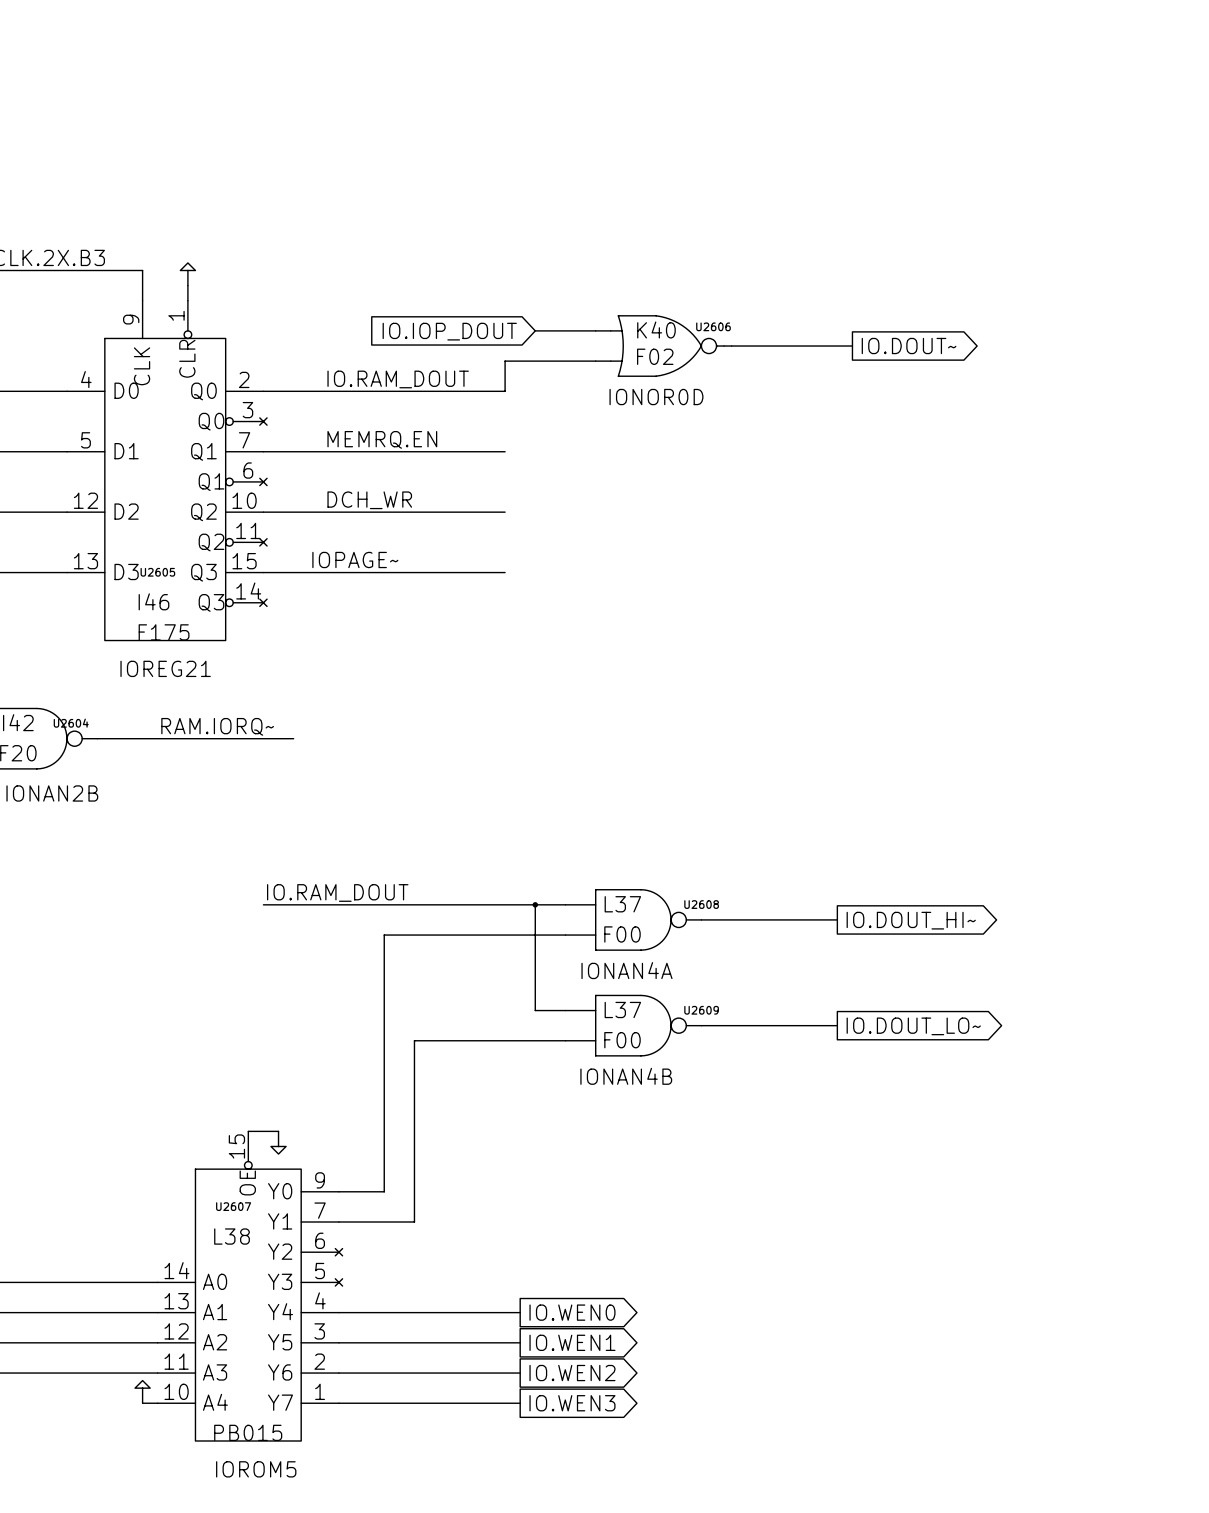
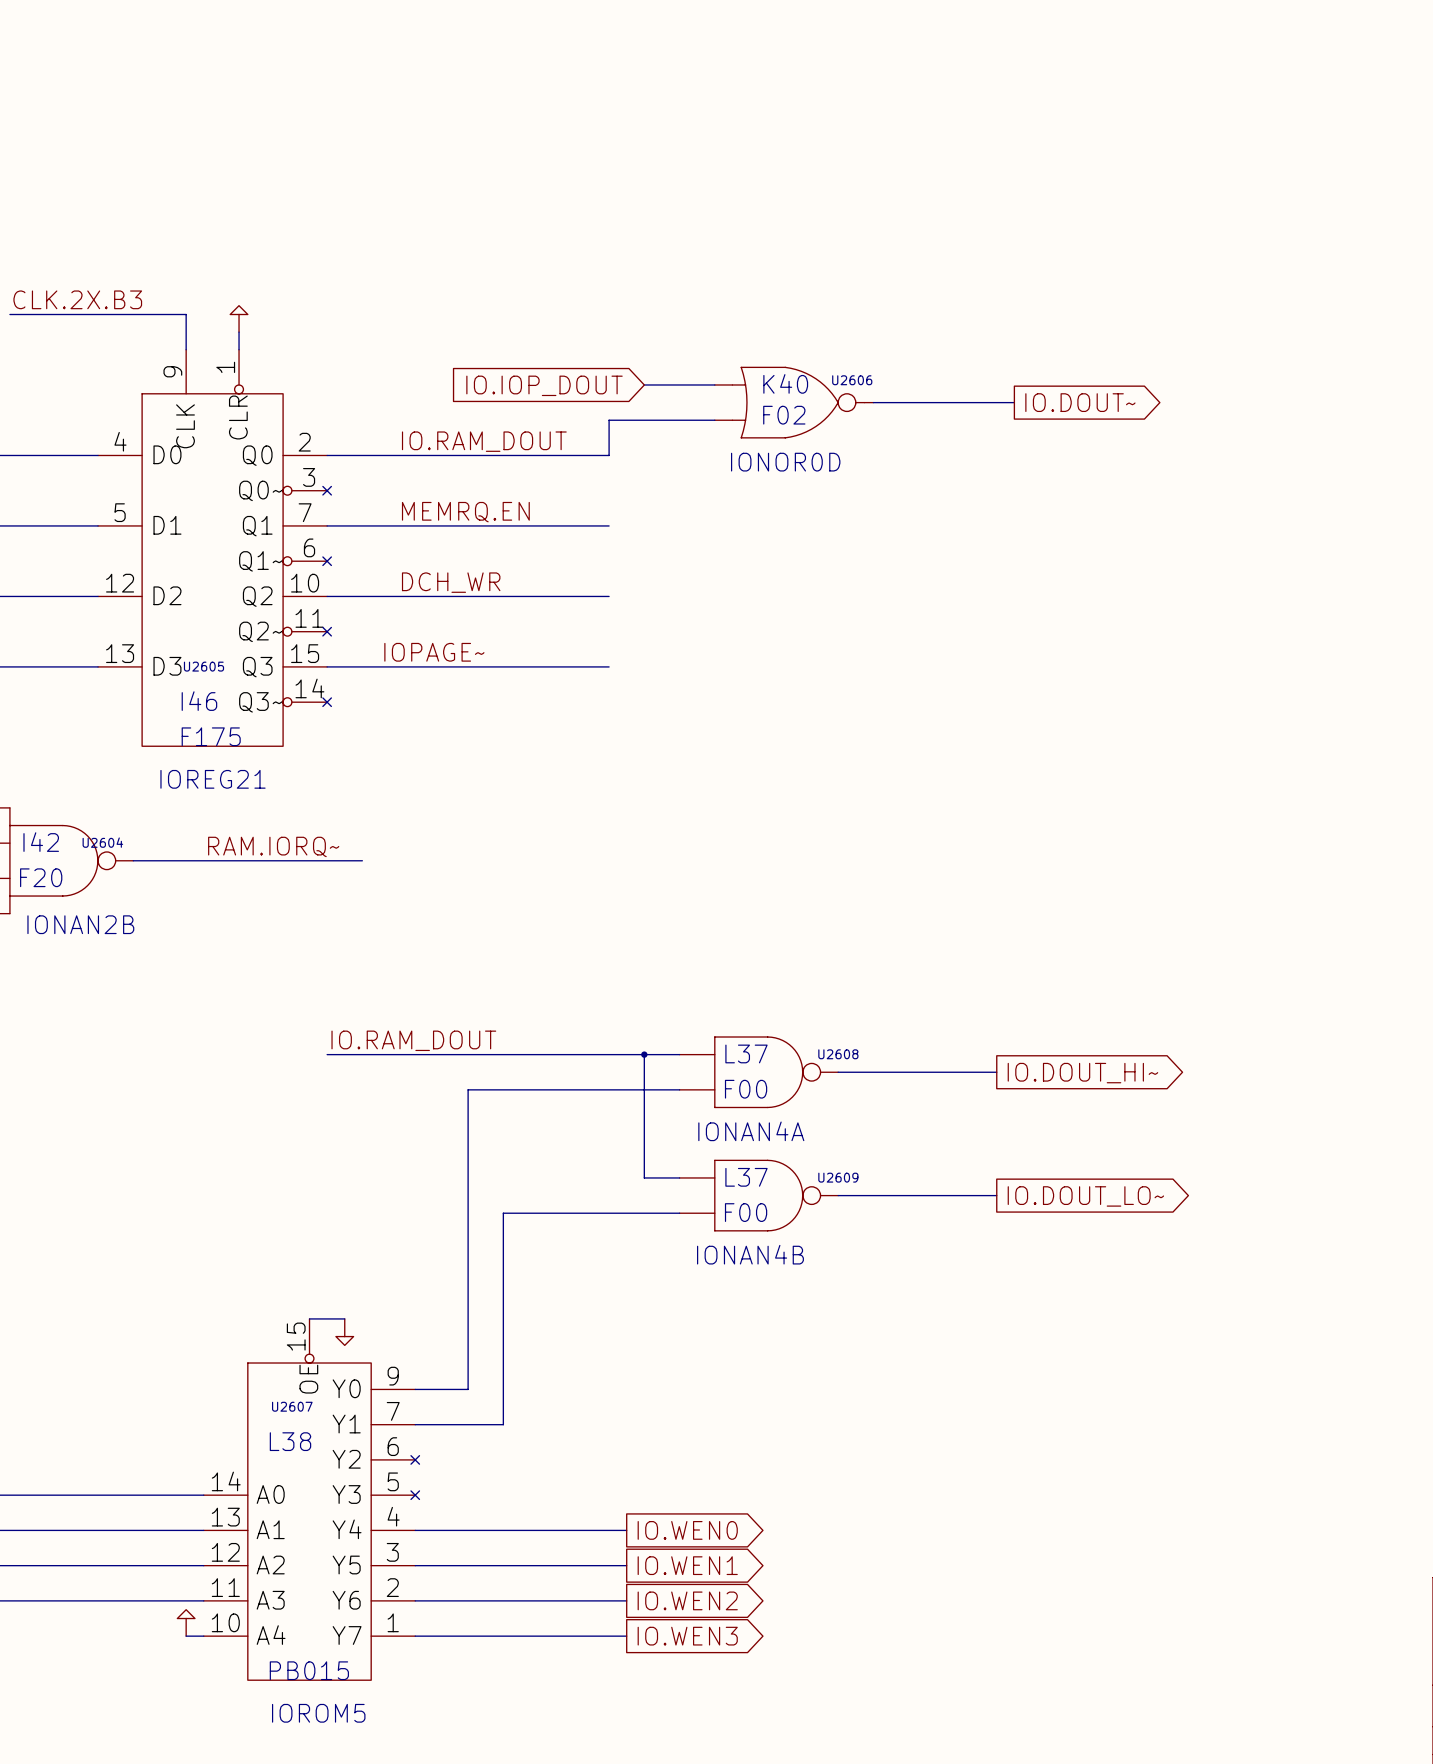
U2605 pin name: Q0 (211, 421) -> Q0~ (260, 490)
U2605 pin name: Q1 (211, 482) -> Q1~ (260, 561)
U2605 pin name: Q2 (211, 542) -> Q2~ (260, 631)
U2605 pin name: Q3 (211, 602) -> Q3~ (260, 702)

